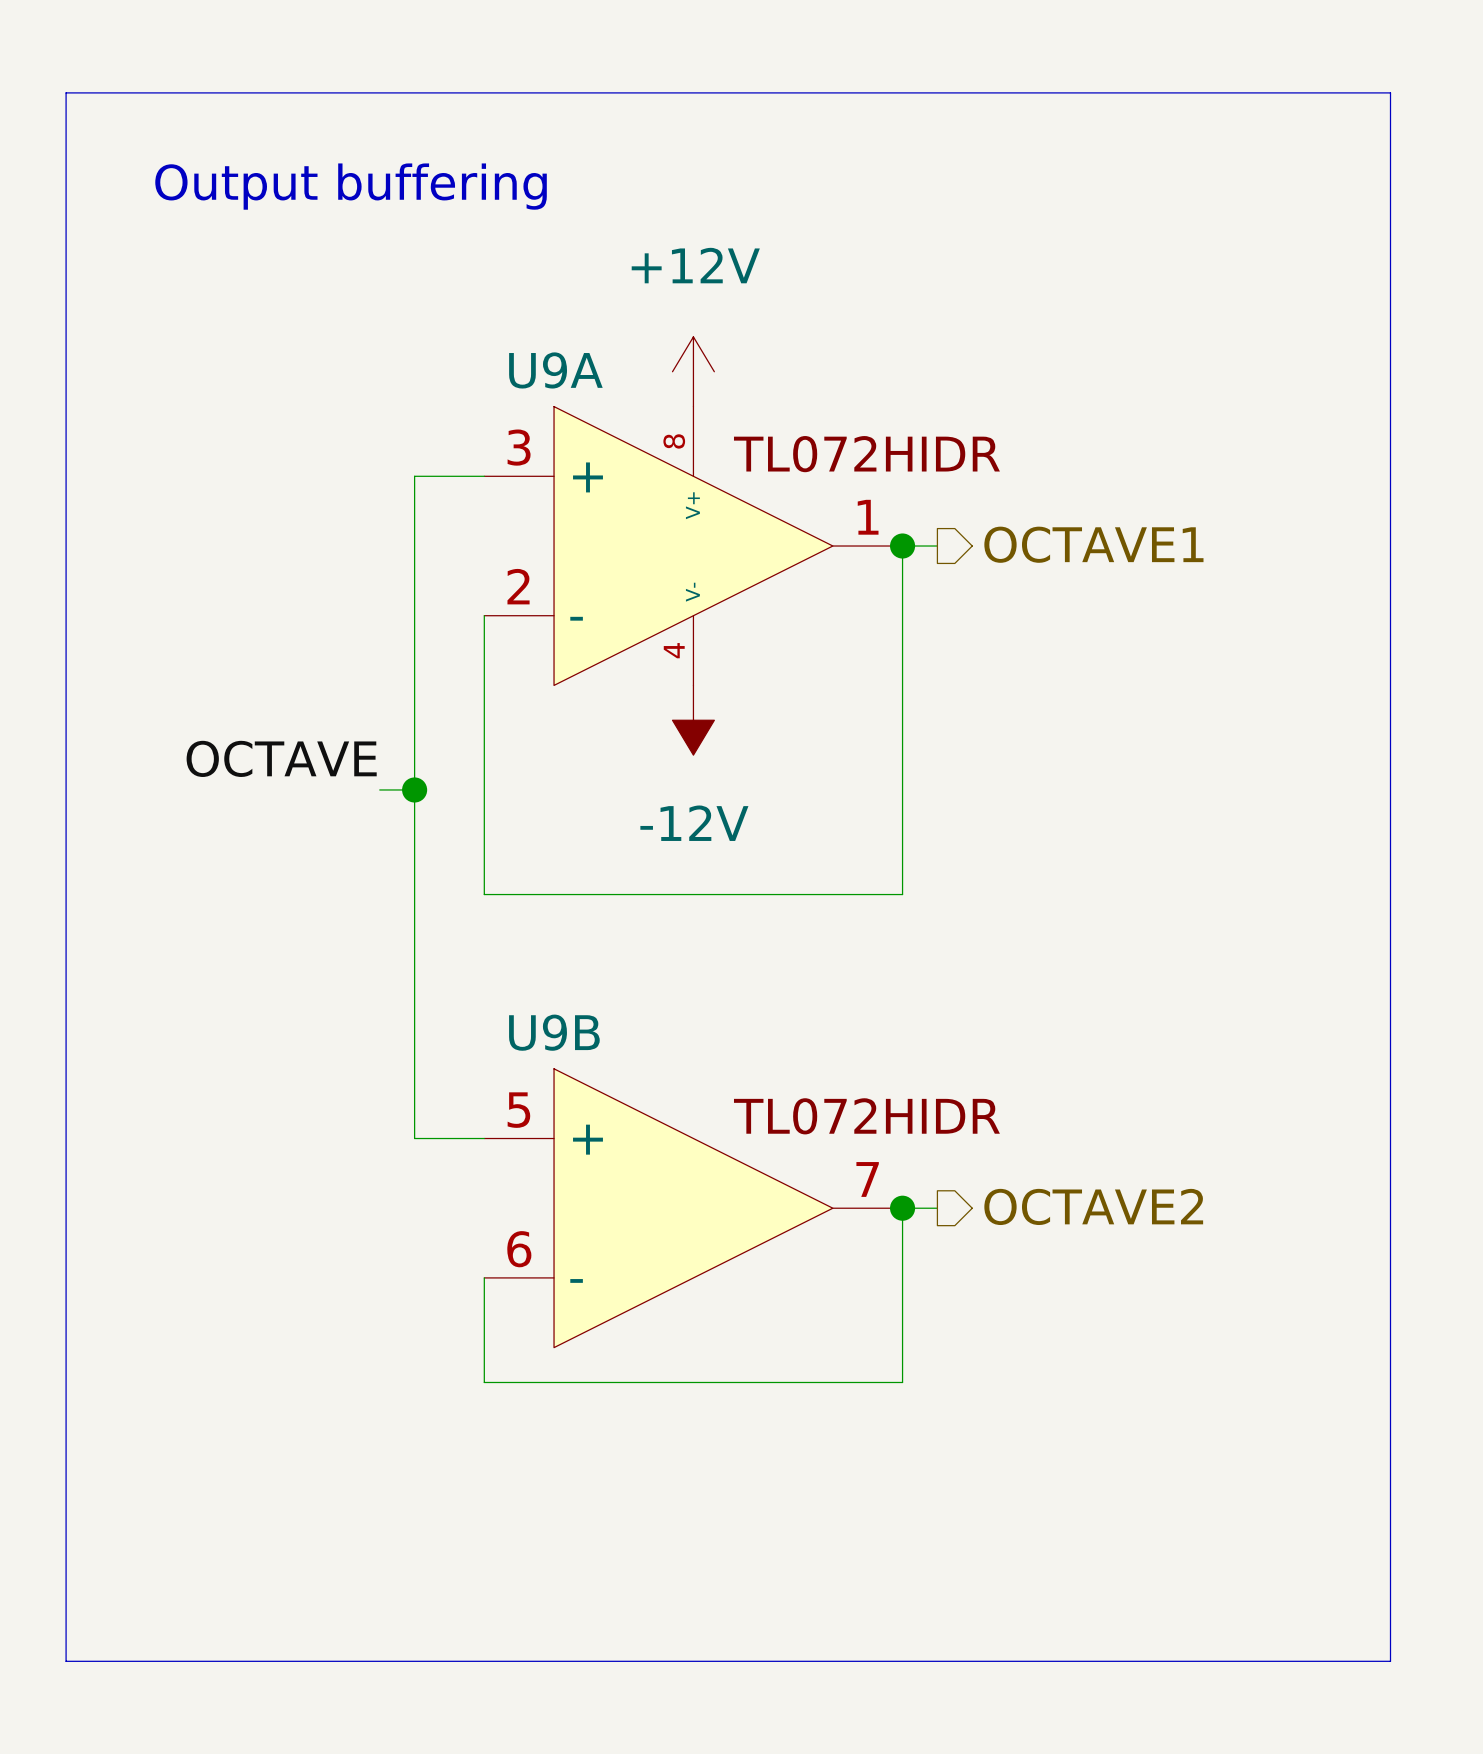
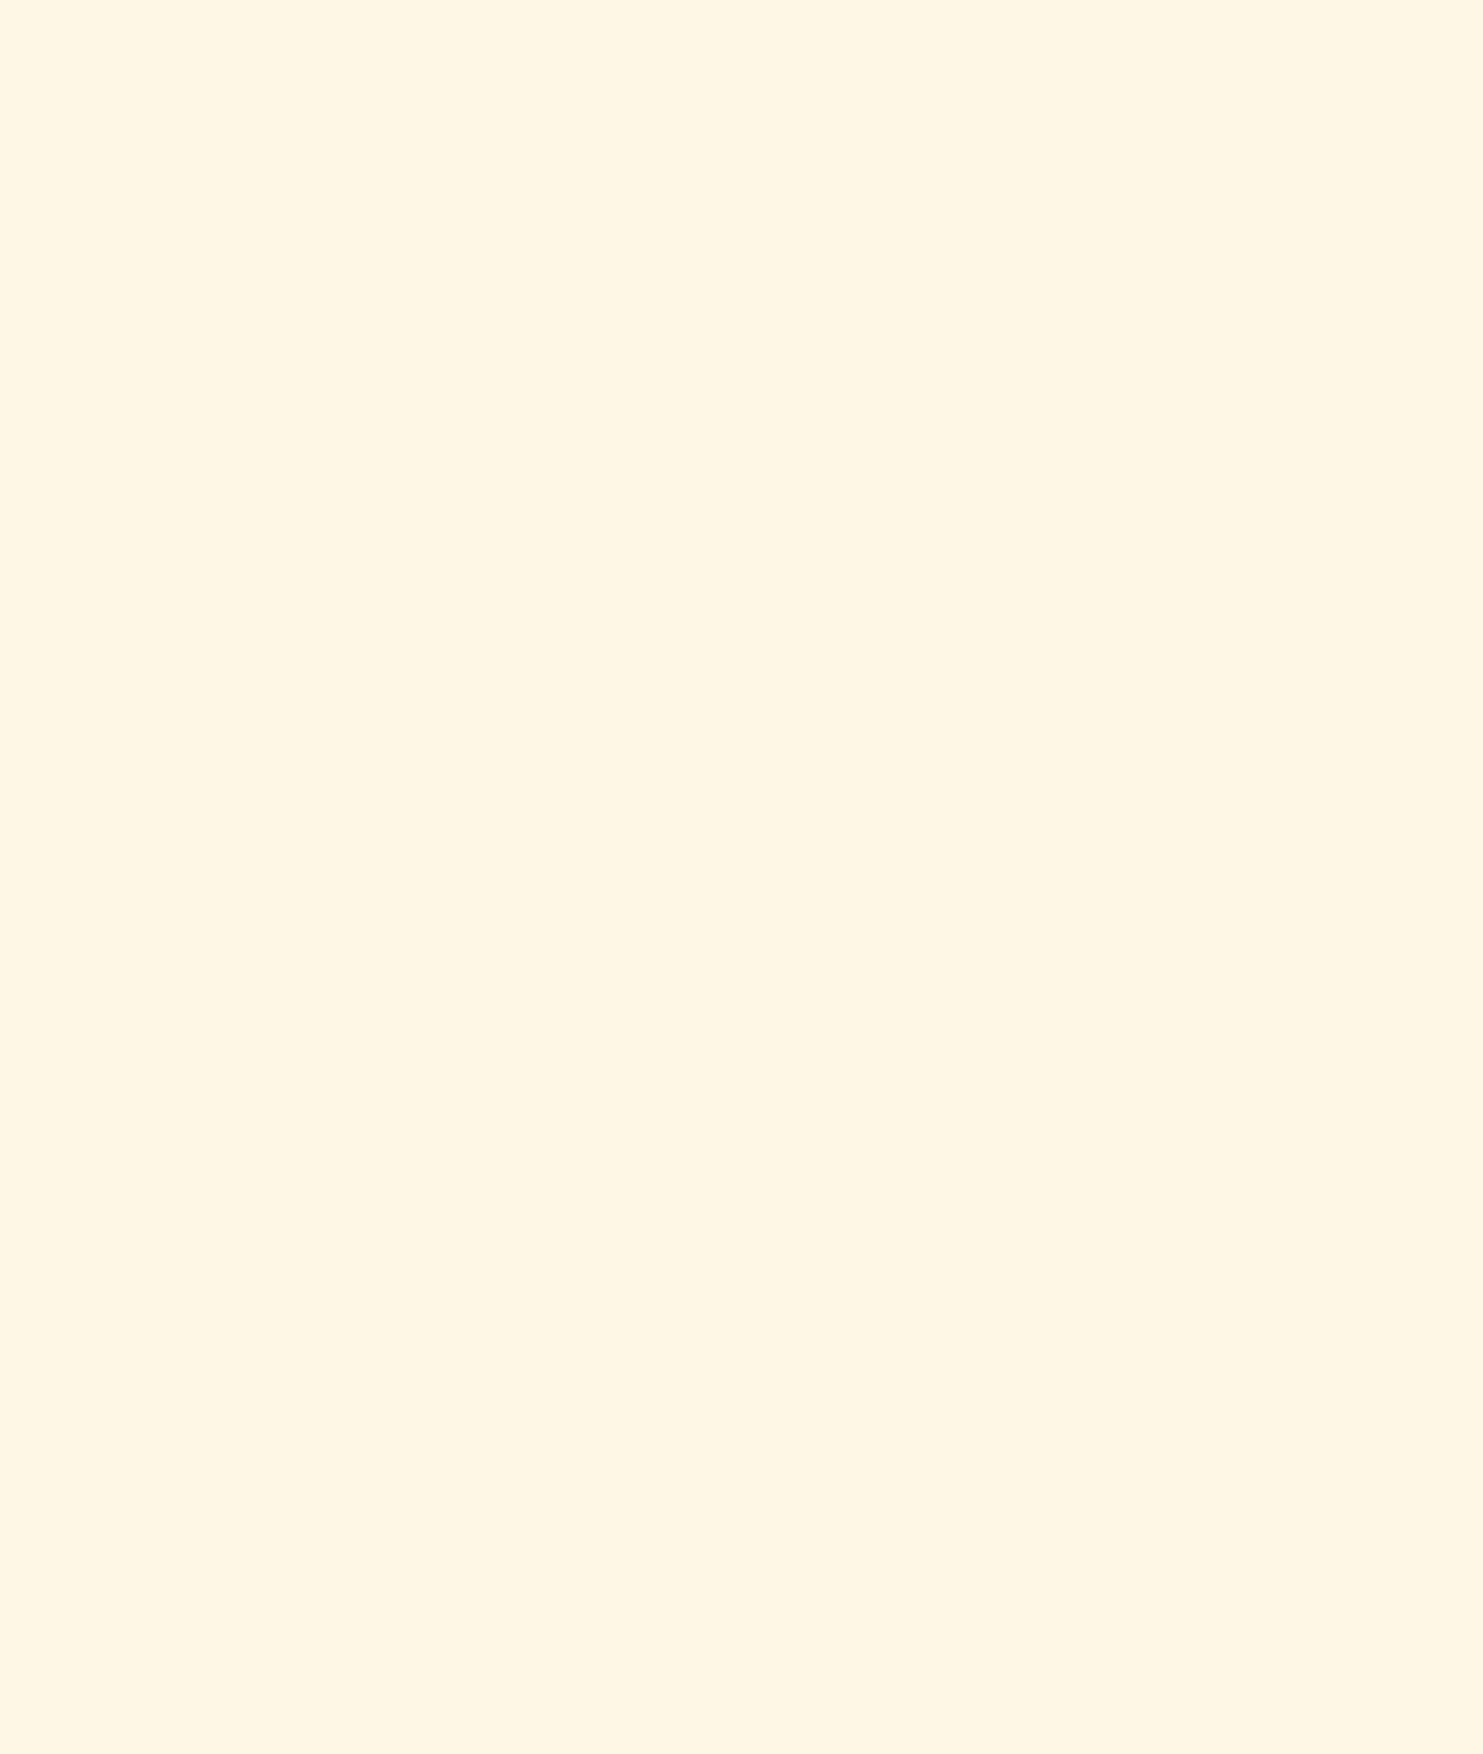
line: (66, 92) (1390, 92) (1390, 1661) (66, 1661) (66, 92) -> none
text: Output buffering (351, 186) -> none
power symbol: +12V (693, 371) -> none
wire: (484, 476) (414, 476) (414, 1138) (484, 1138) -> none
hierarchical label: OCTAVE1 (1093, 544) -> none
U9A: (693, 546) -> none
junction: (902, 546) -> none
wire: (937, 546) (902, 546) (902, 894) (484, 894) (484, 615) -> none
power symbol: -12V (693, 720) -> none
label: OCTAVE (281, 758) -> none
wire: (379, 789) (414, 789) -> none
junction: (414, 789) -> none
hierarchical label: OCTAVE2 (1093, 1206) -> none
U9B: (693, 1208) -> none
junction: (902, 1208) -> none
wire: (937, 1208) (902, 1208) (902, 1382) (484, 1382) (484, 1277) -> none

